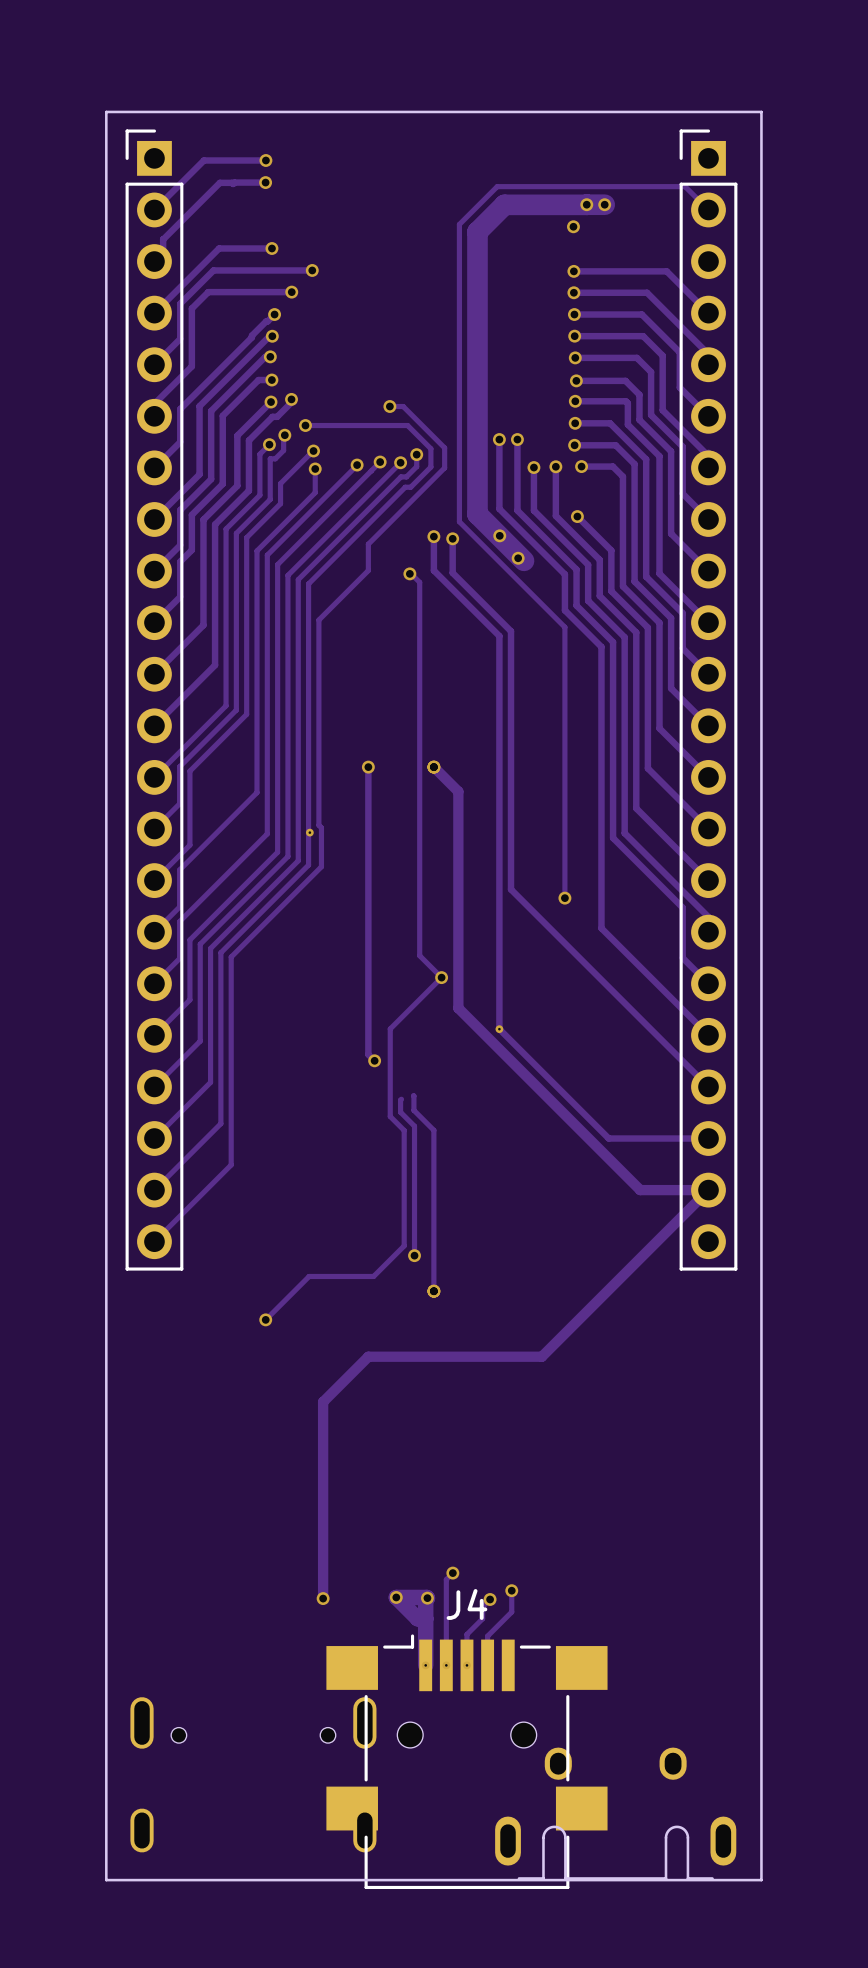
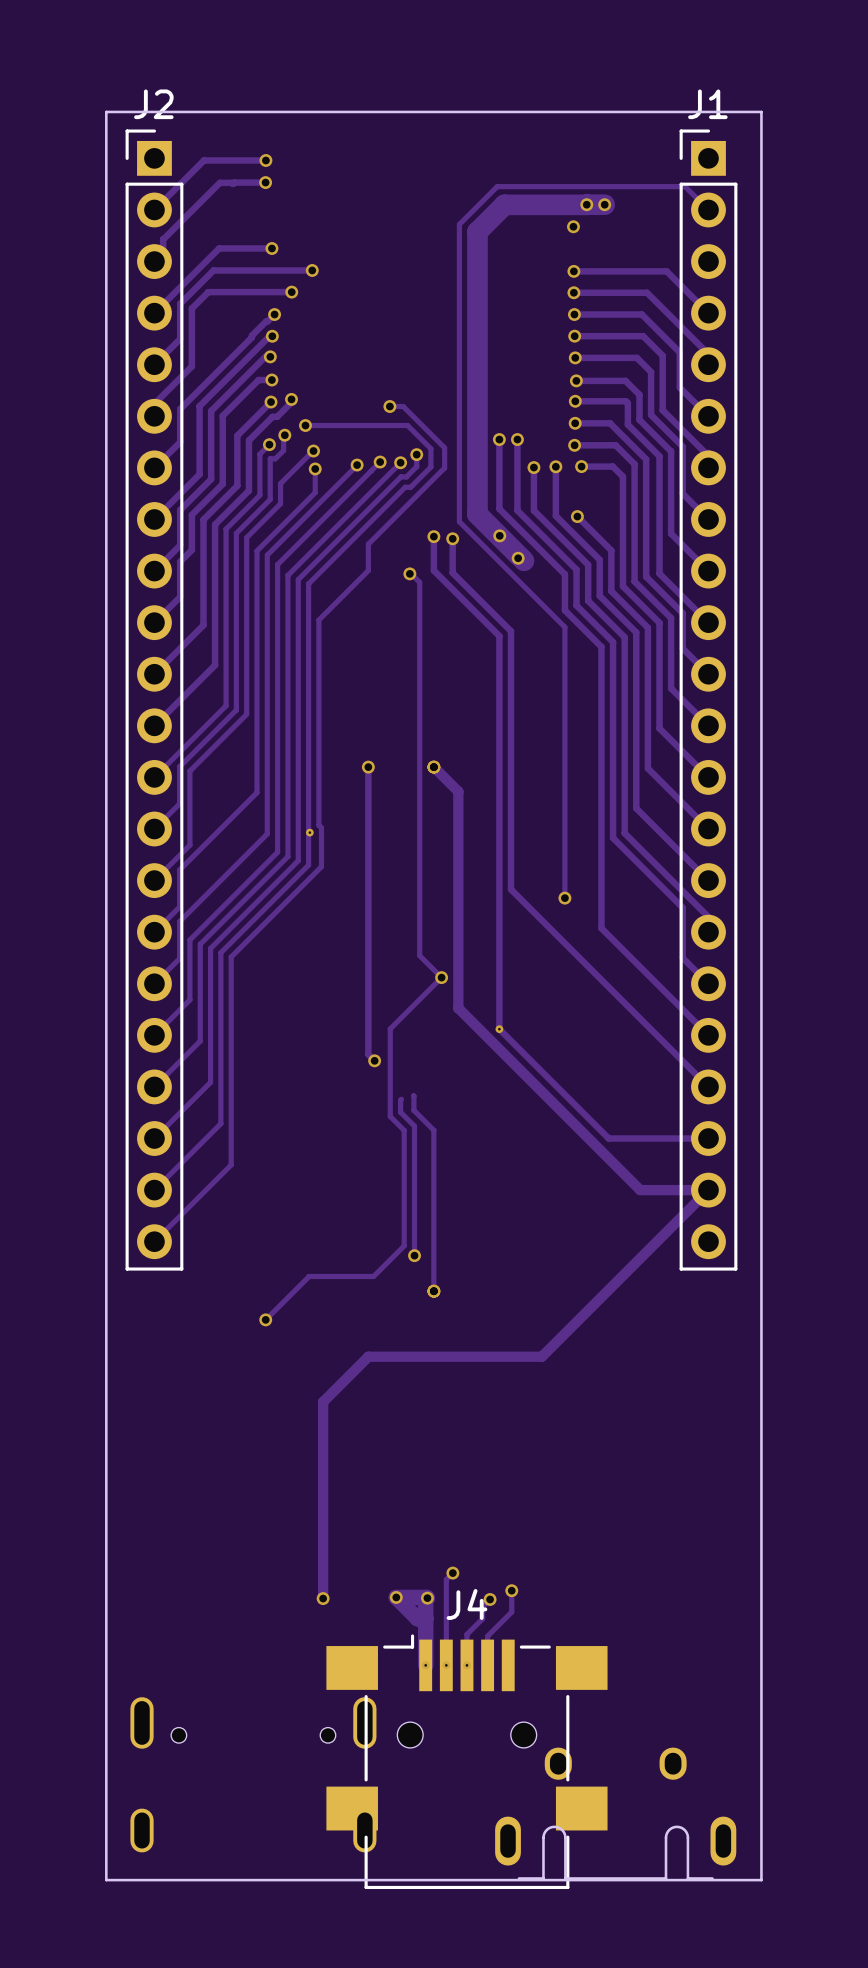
J2 name: none -> J2 (153, 104)
J1 name: none -> J1 (707, 104)

